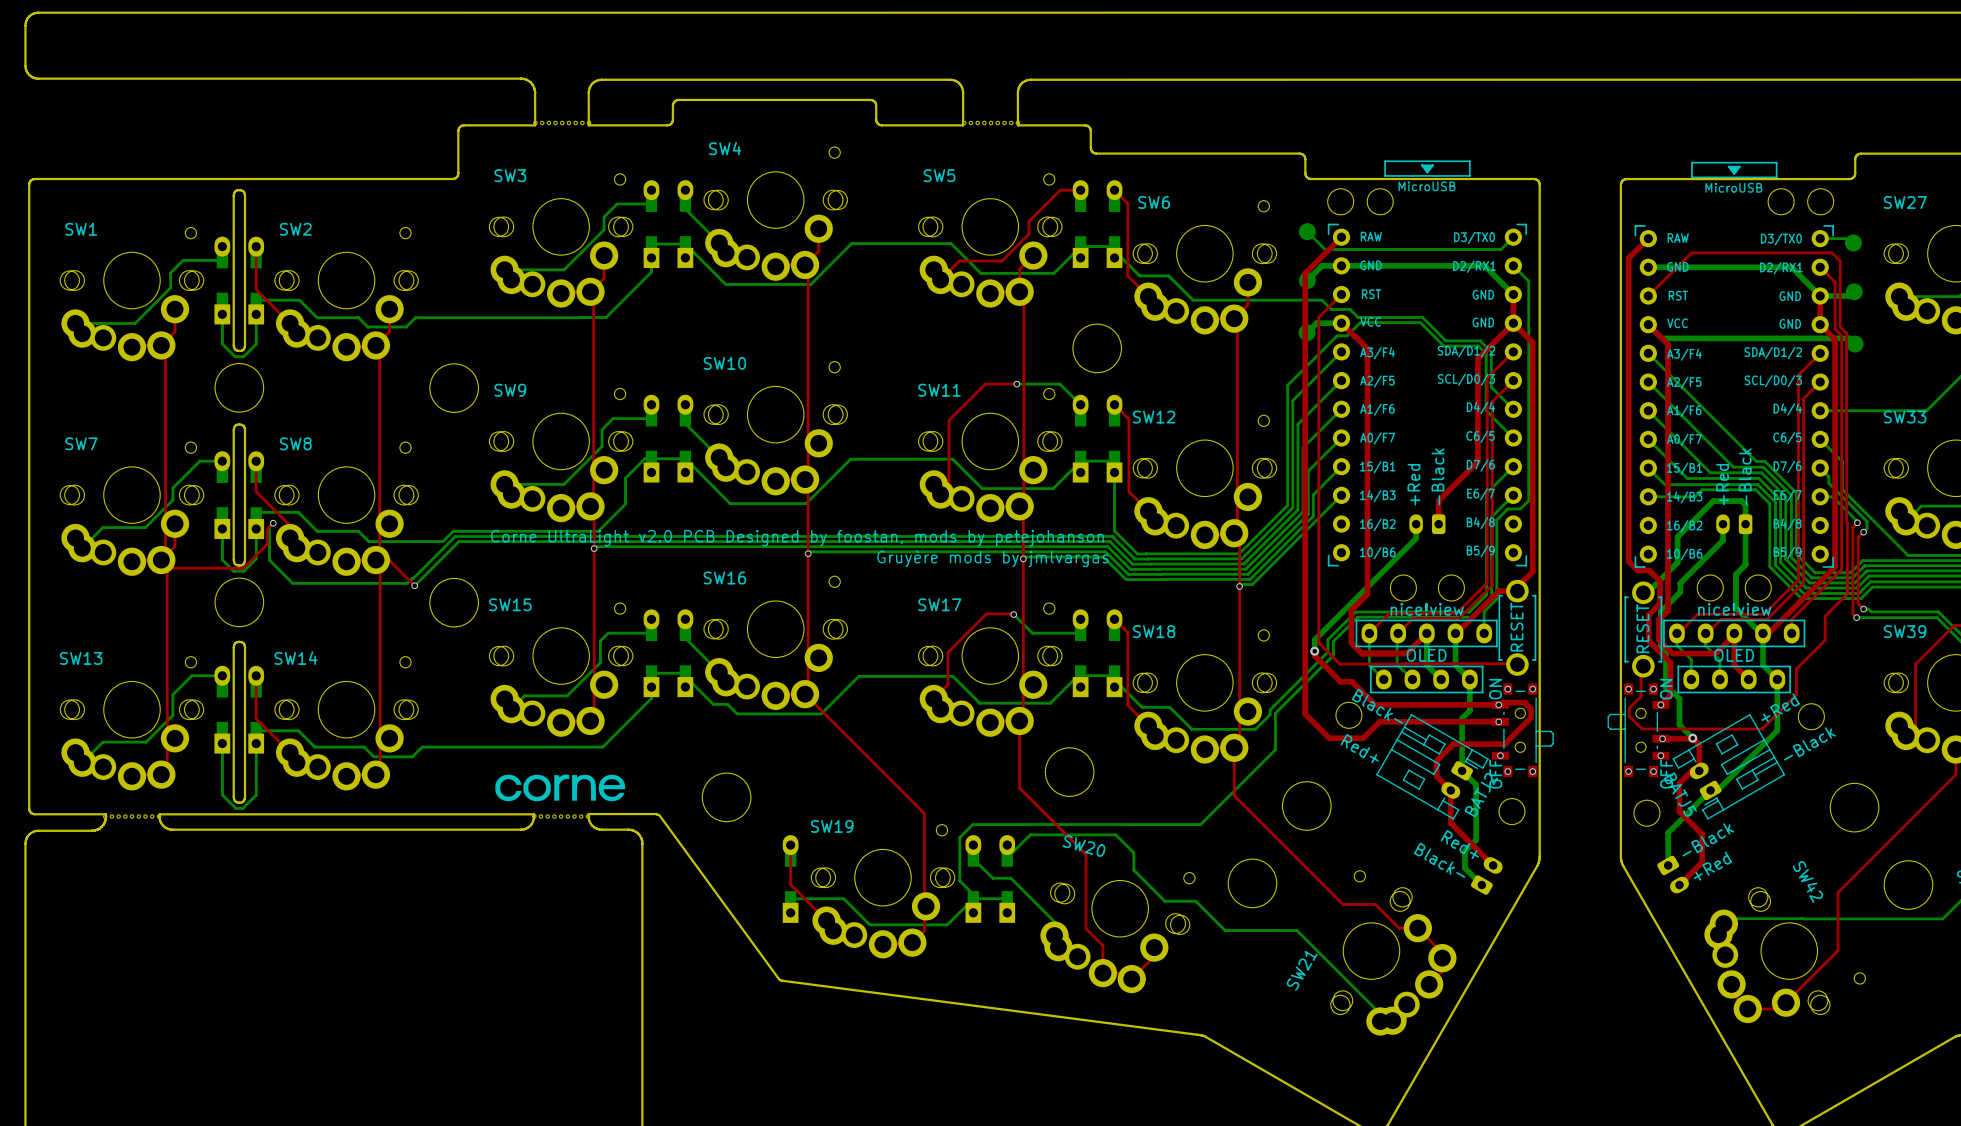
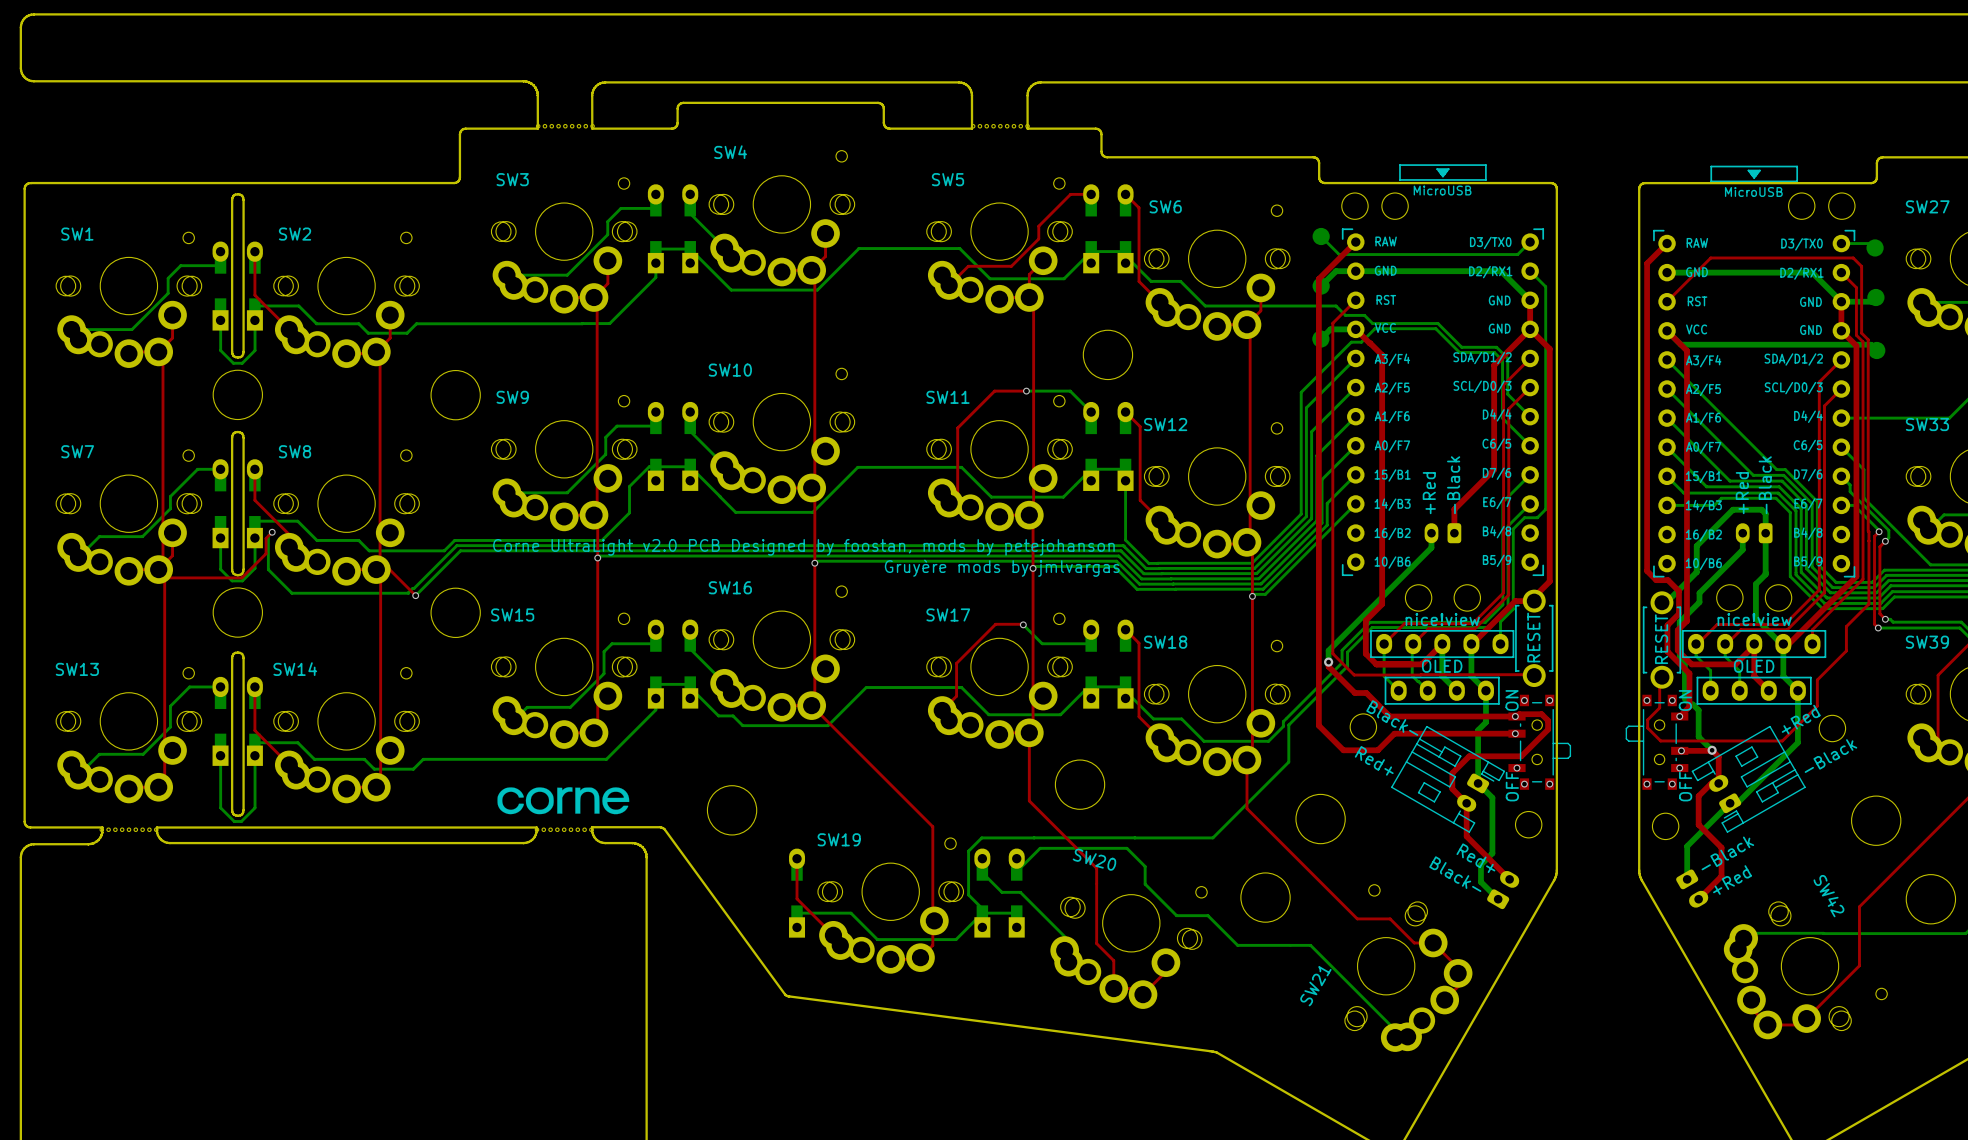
BATJ5 name: BATJ5 (1680, 794) -> none
BATJ2 name: BATJ2 (1481, 795) -> none

